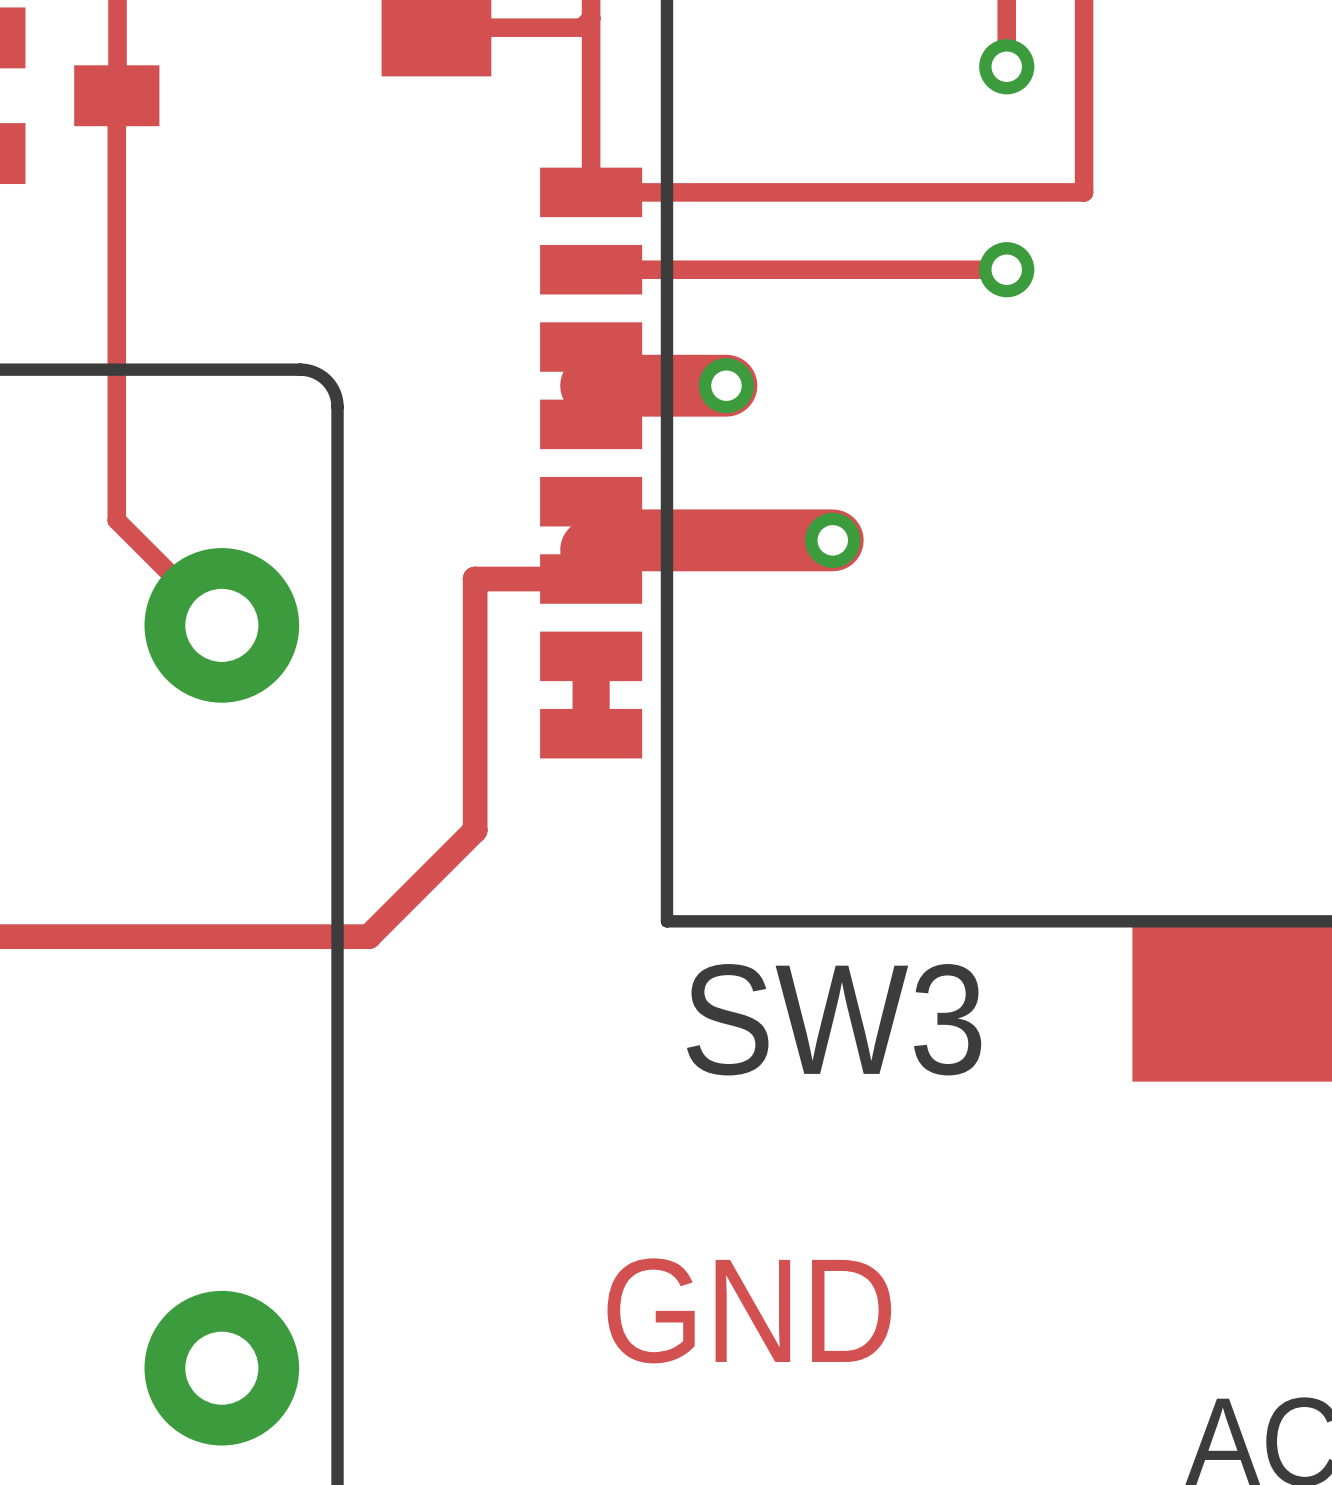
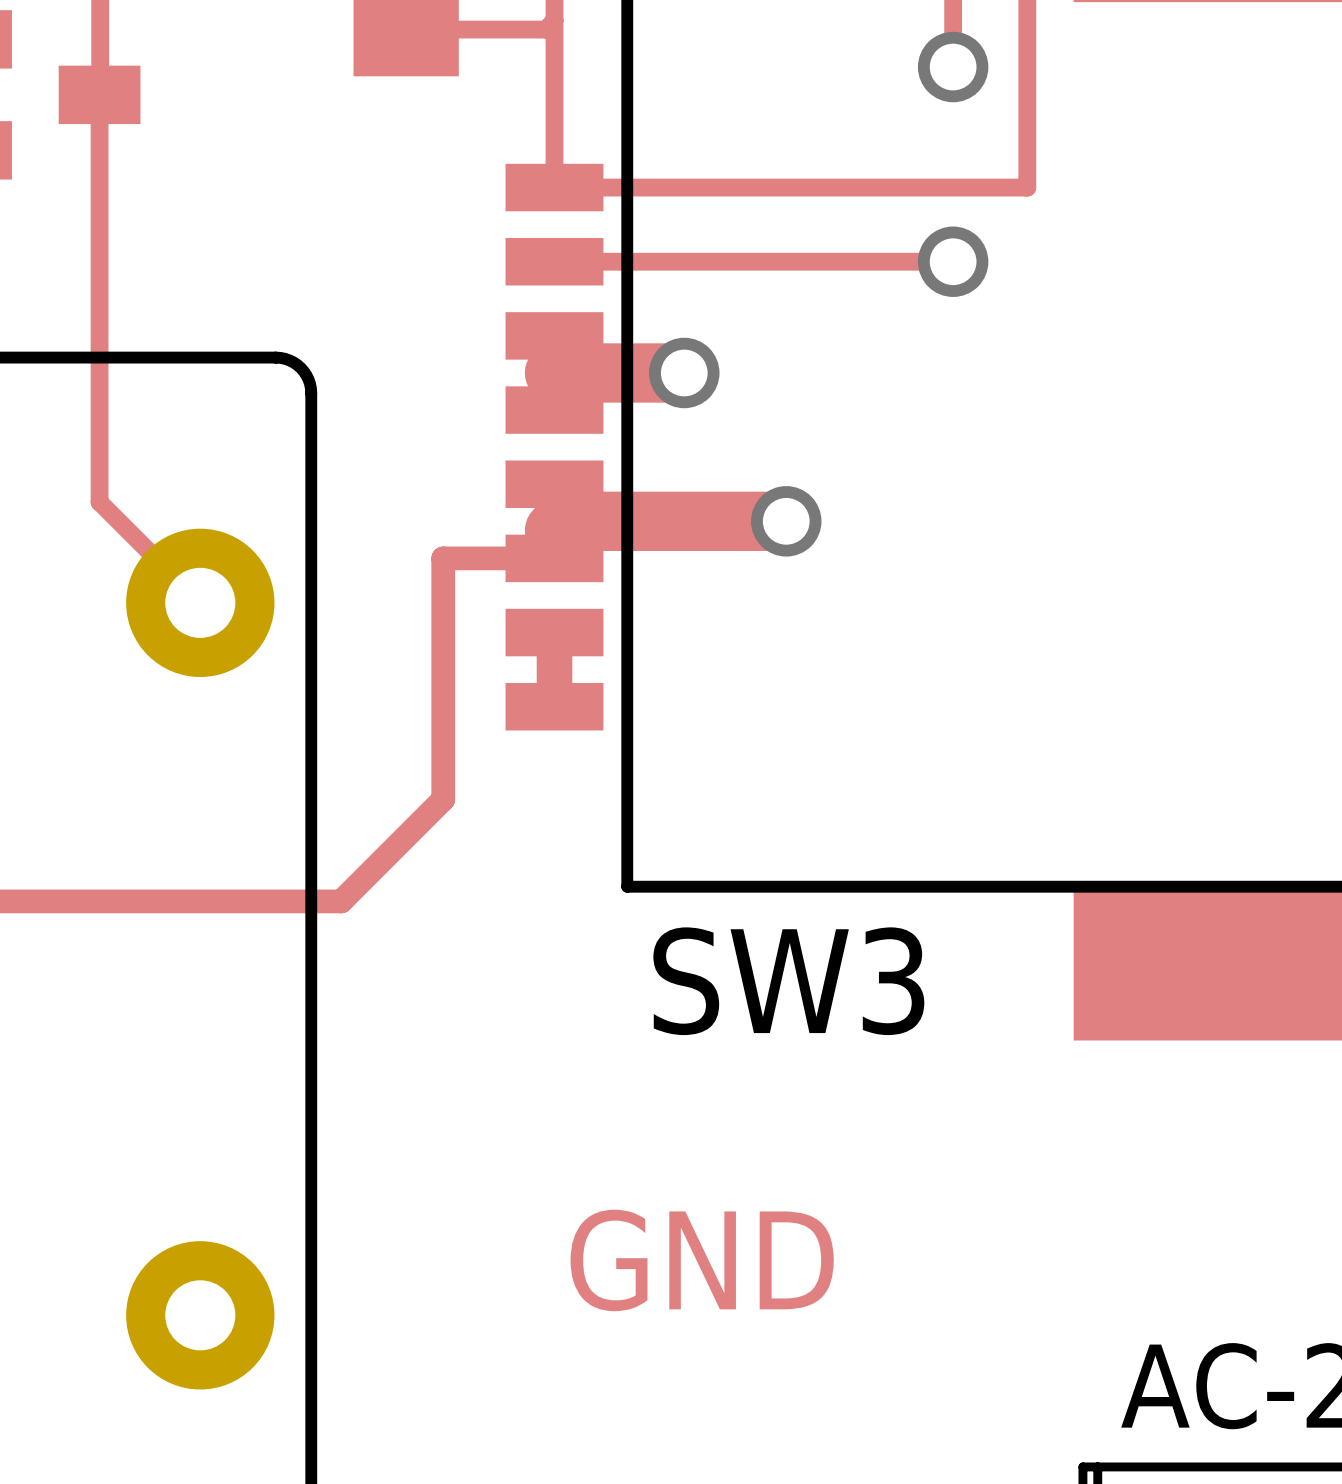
via size: [979, 39, 1035, 95] -> [917, 31, 989, 103]
via size: [979, 242, 1035, 298] -> [917, 226, 989, 297]
via size: [698, 358, 755, 414] -> [649, 337, 720, 409]
via size: [805, 512, 861, 568] -> [751, 486, 822, 557]

